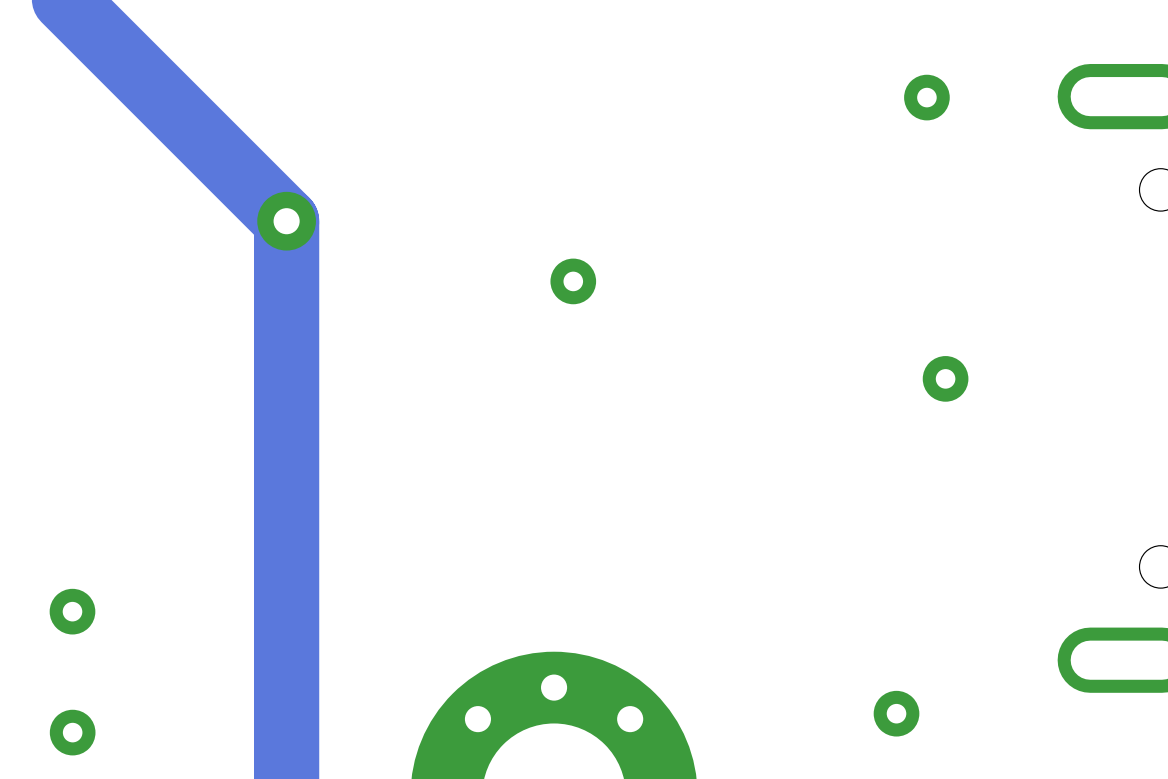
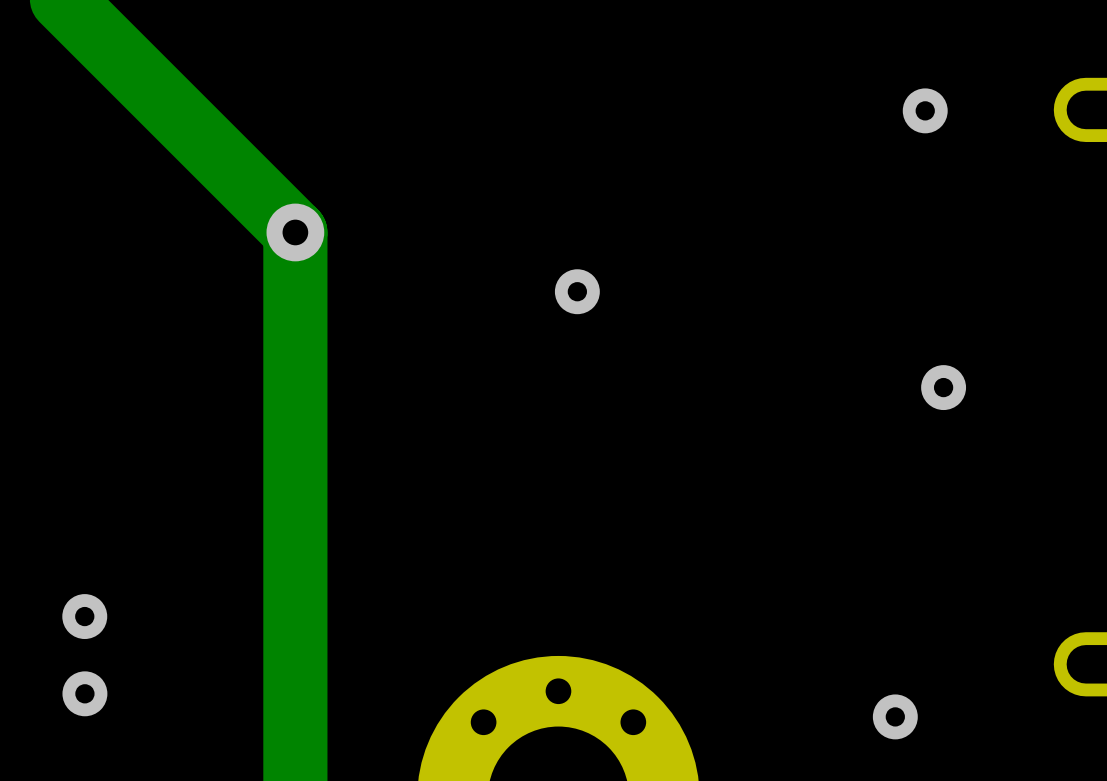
via position: (72, 732) -> (84, 693)

